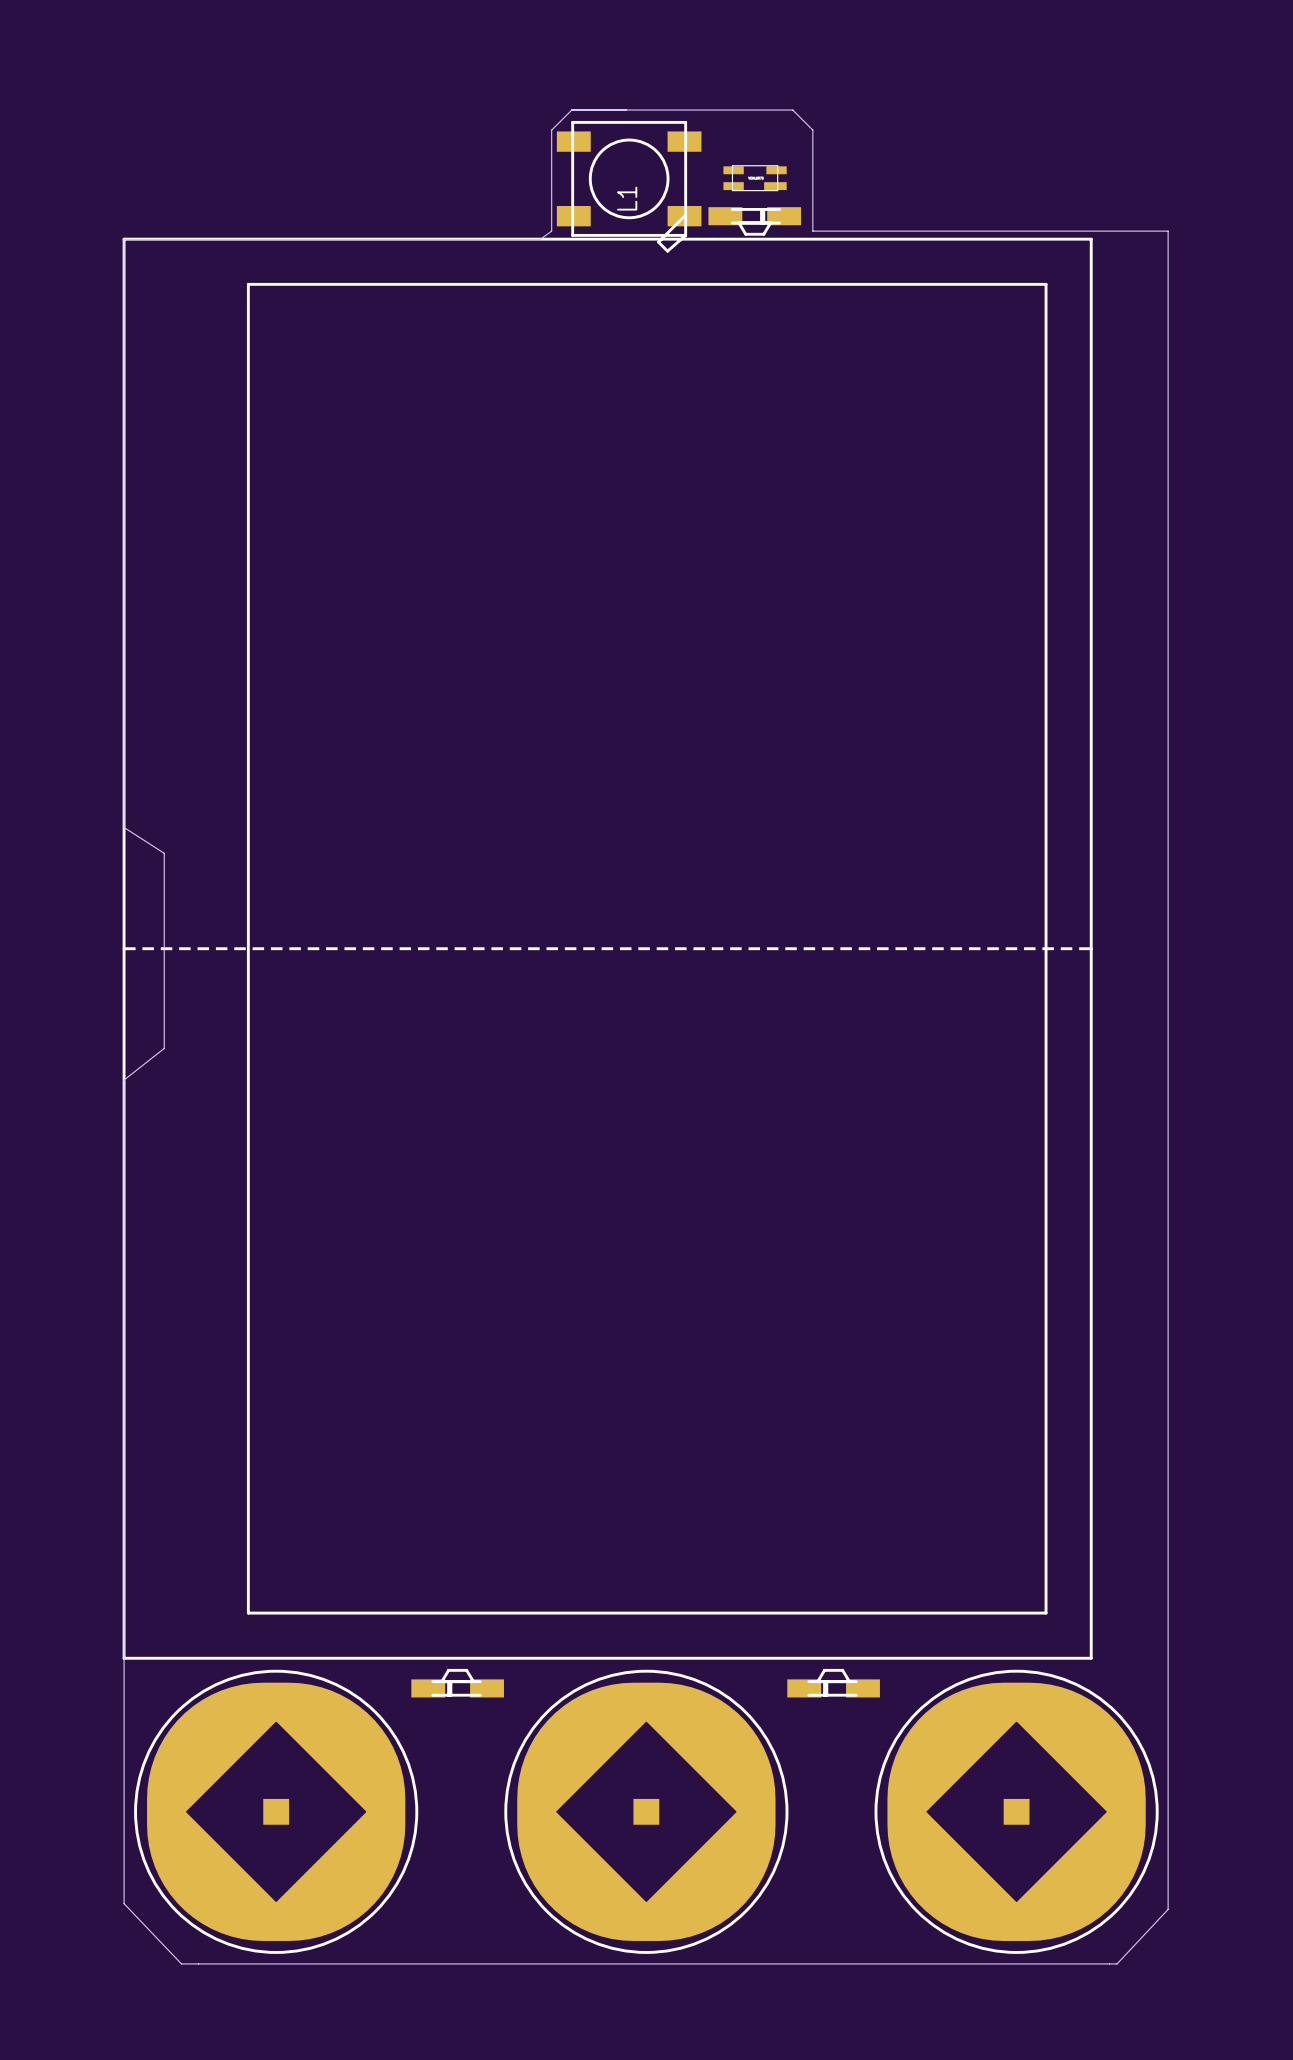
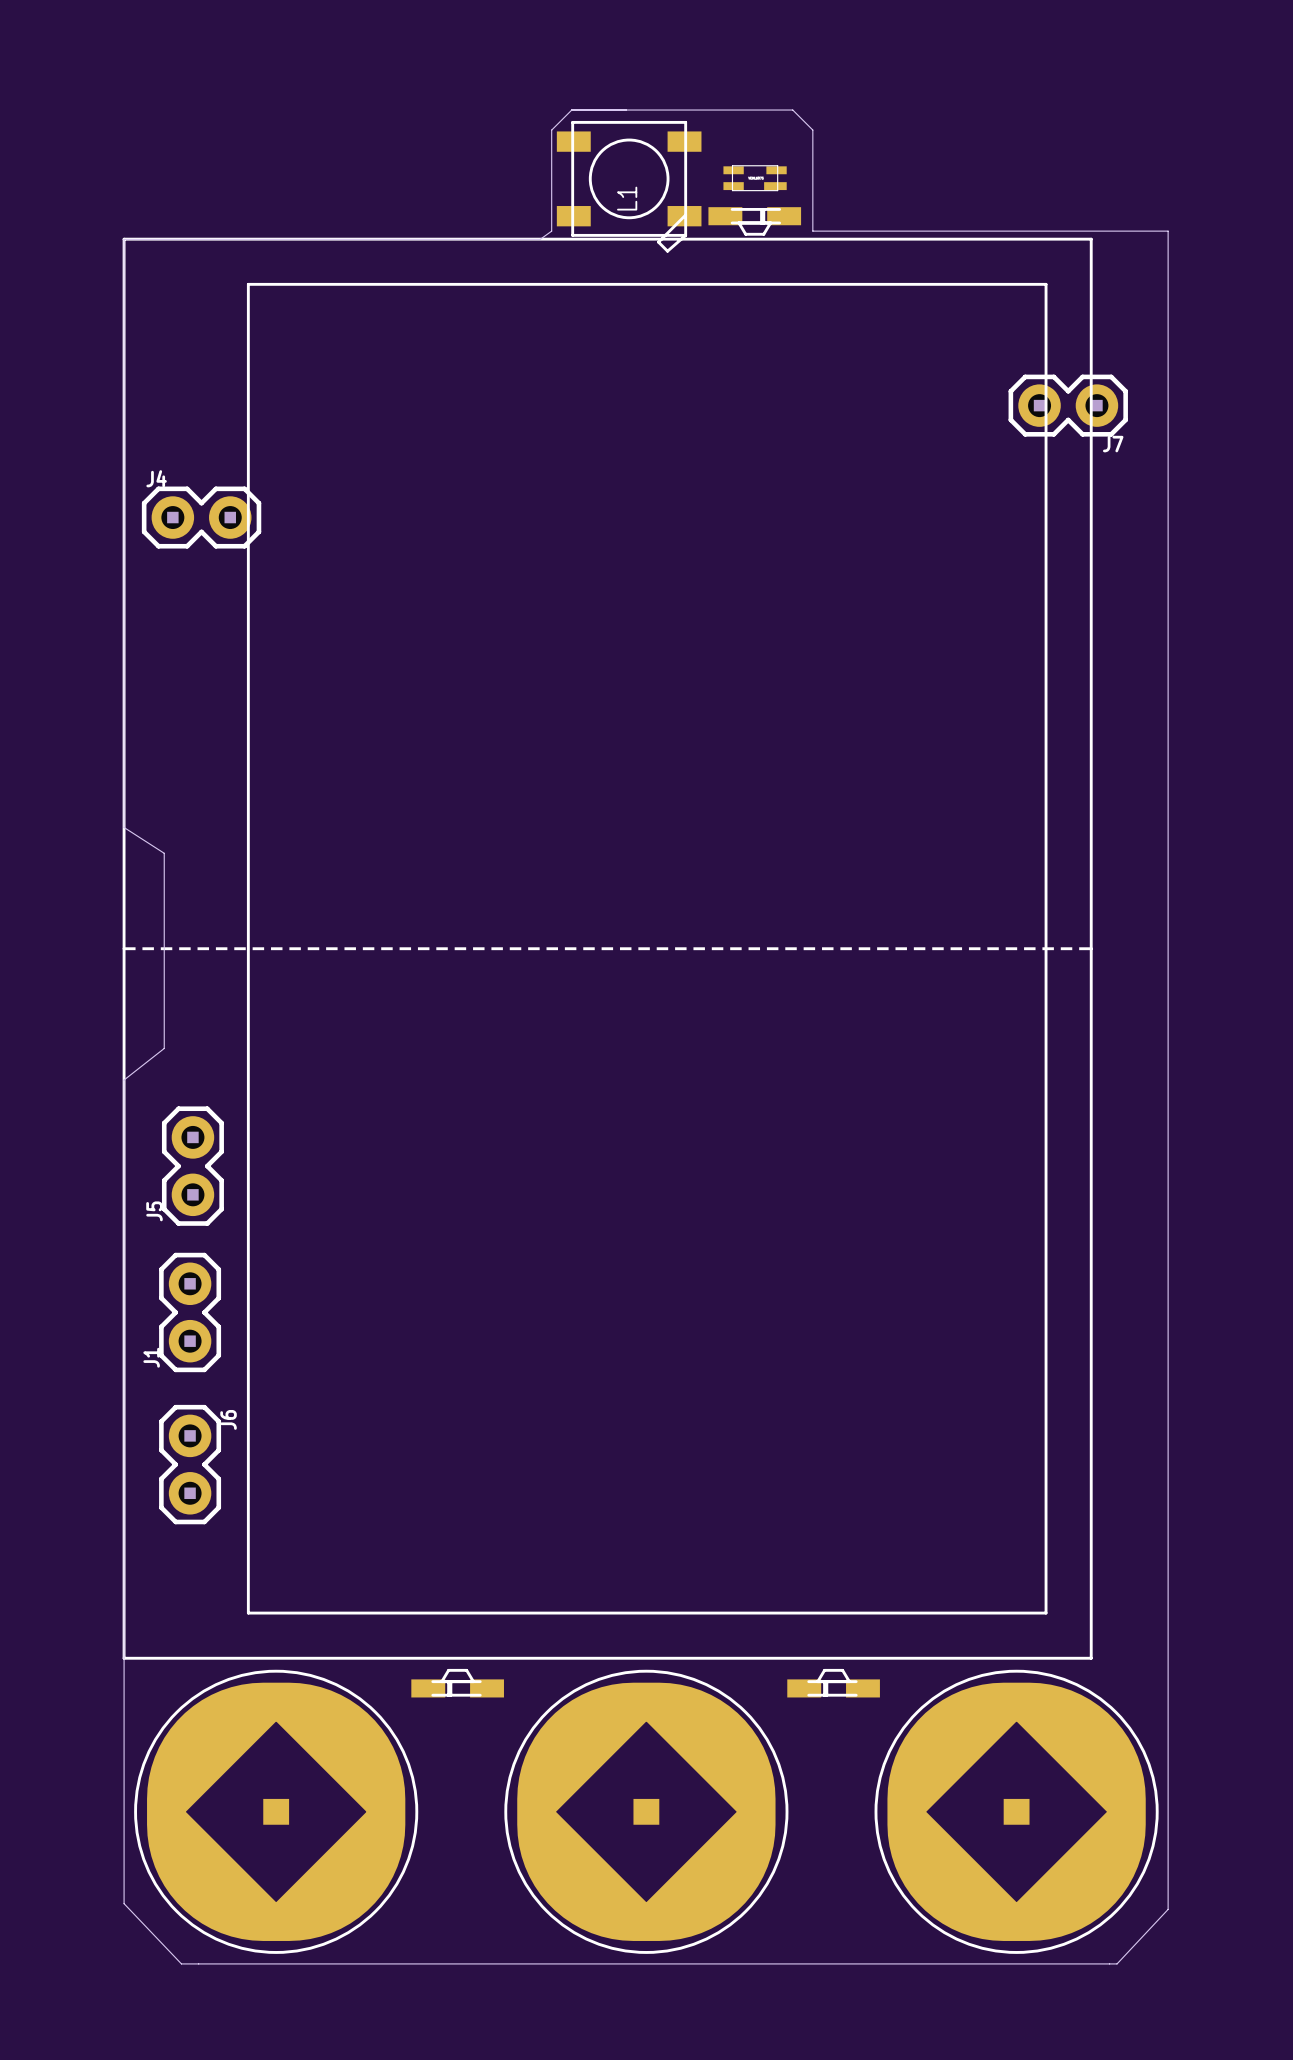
J7: none -> (1068, 405)
J4: none -> (201, 517)
J5: none -> (192, 1166)
J1: none -> (190, 1312)
J6: none -> (190, 1464)

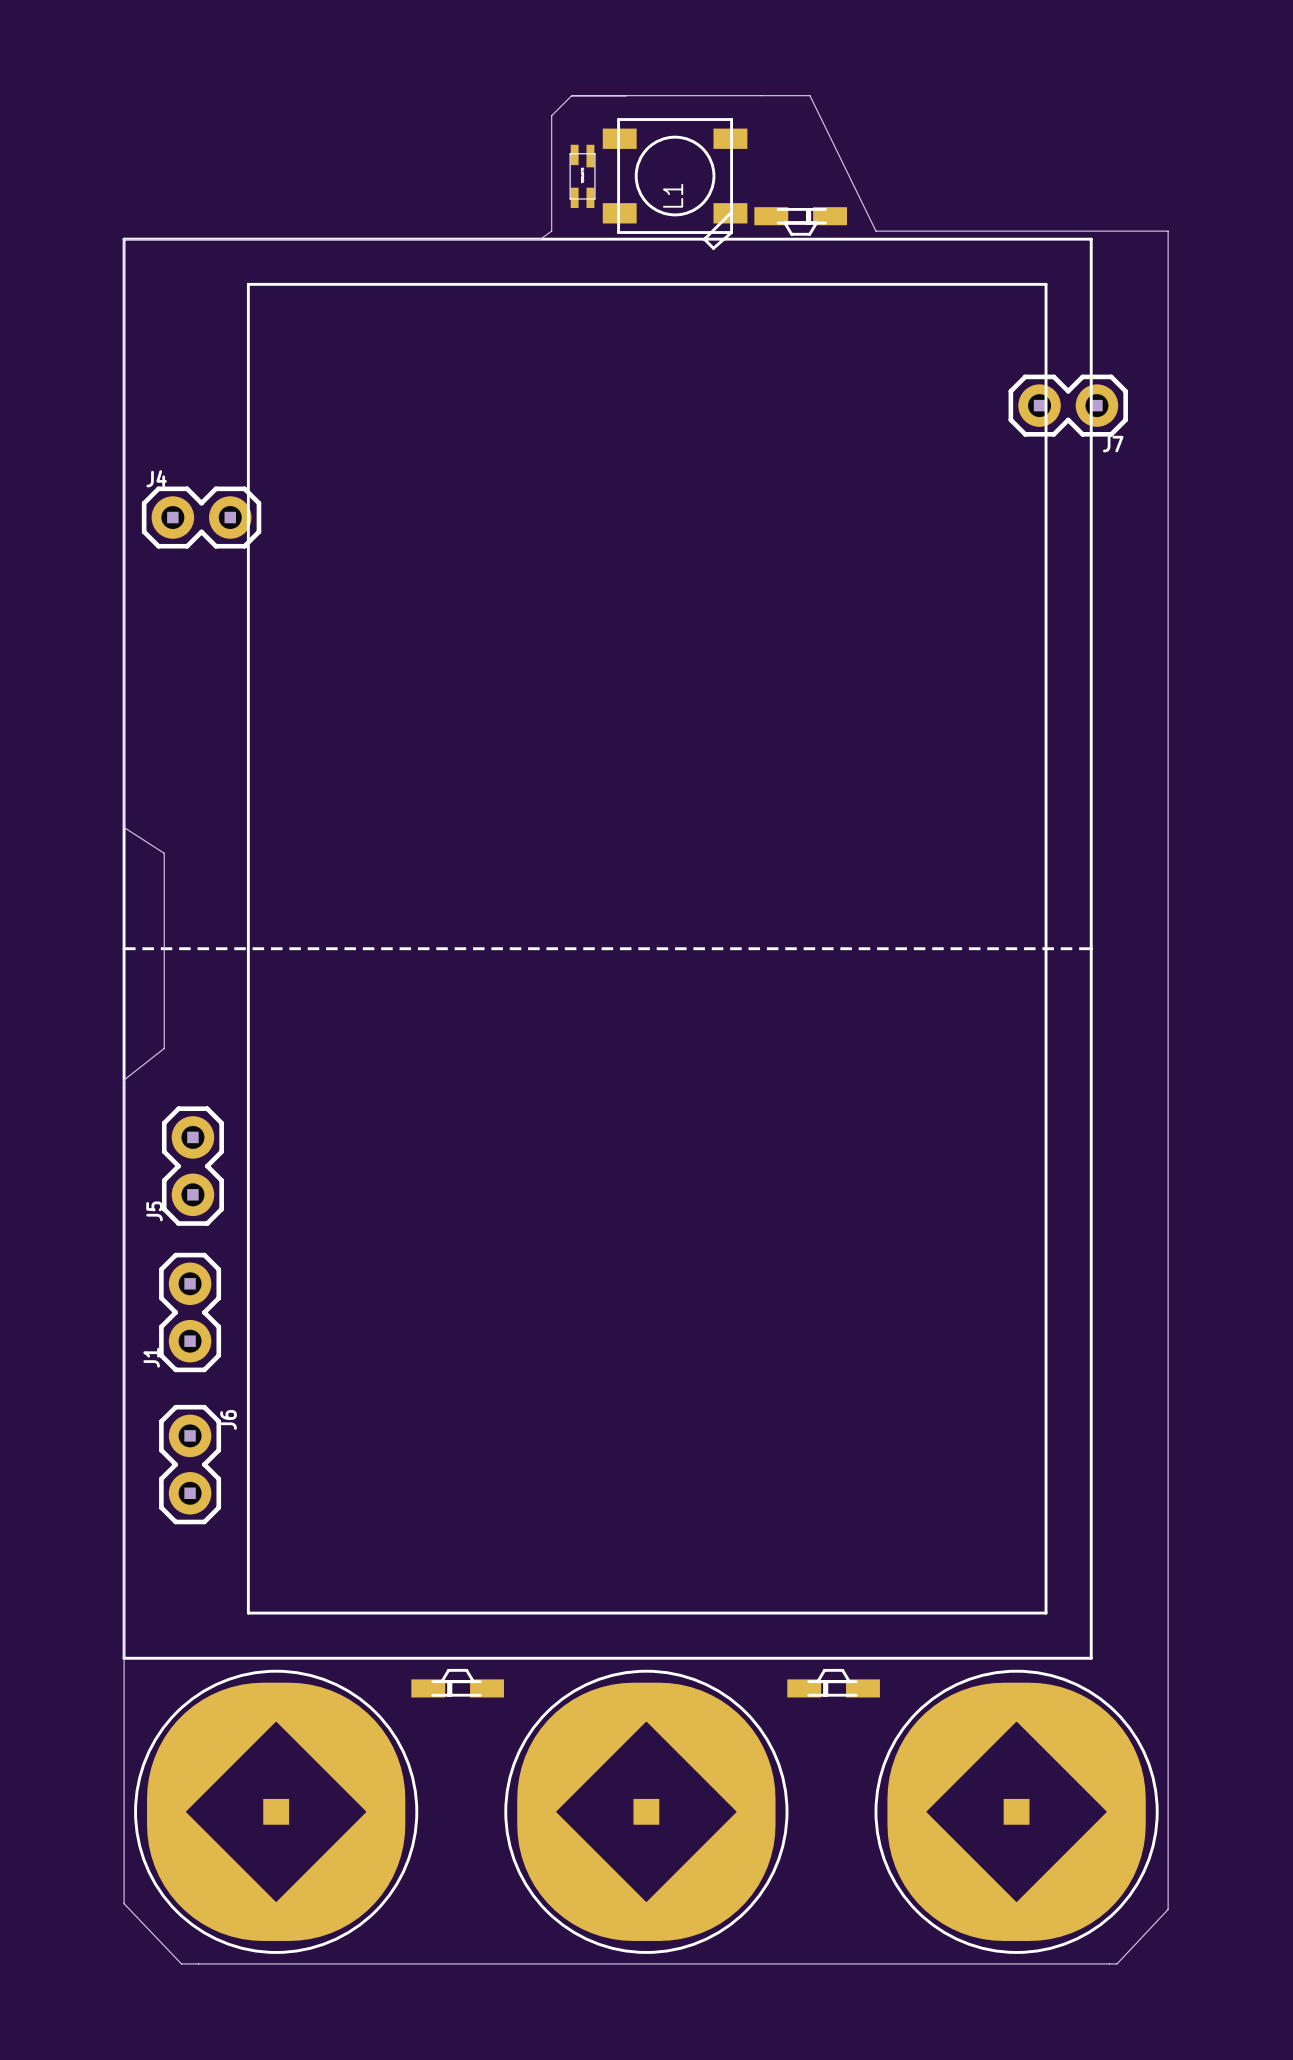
board edge: (551, 130) (571, 110) (792, 110) (812, 130) (812, 231) (875, 231) -> (551, 130) (551, 115) (571, 95) (809, 95) (875, 231)
part rotation: 0° (755, 178) -> 90° counterclockwise (582, 176)
part position: (755, 178) -> (582, 176)
L1 position: (629, 186) -> (675, 183)
part position: (754, 221) -> (800, 221)

